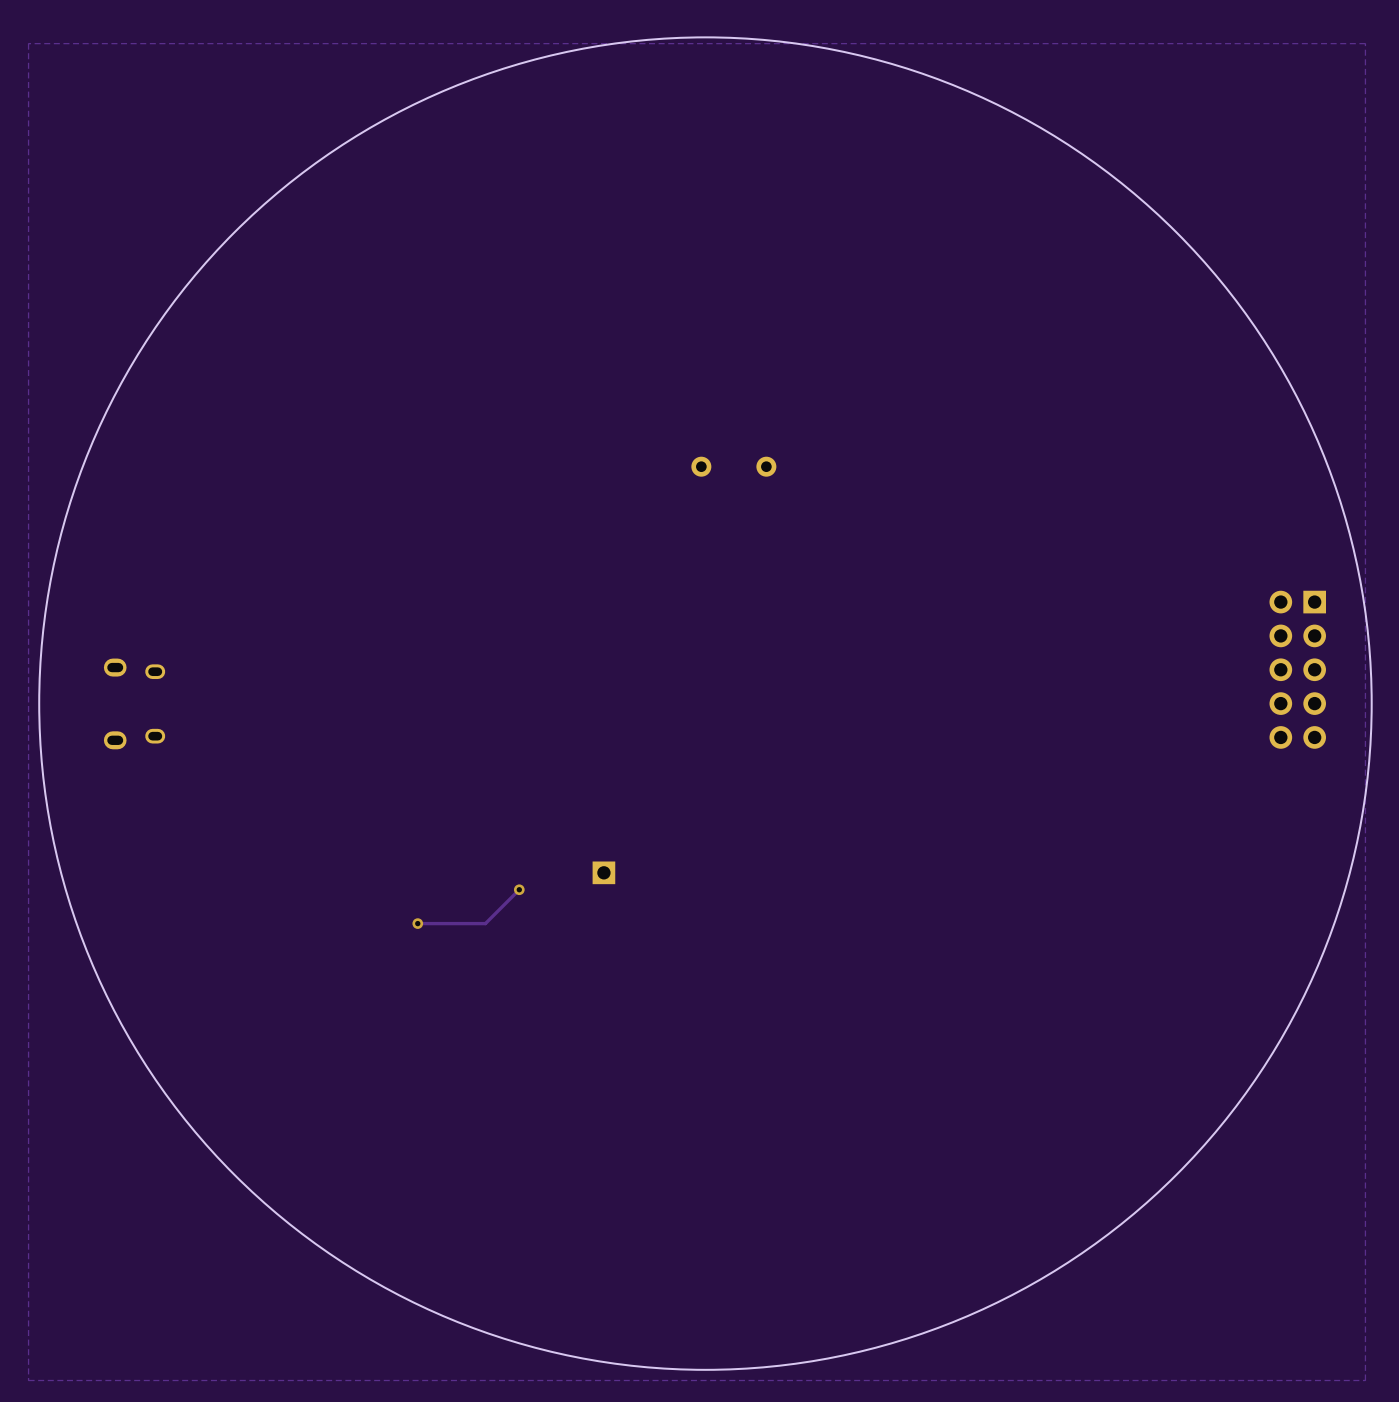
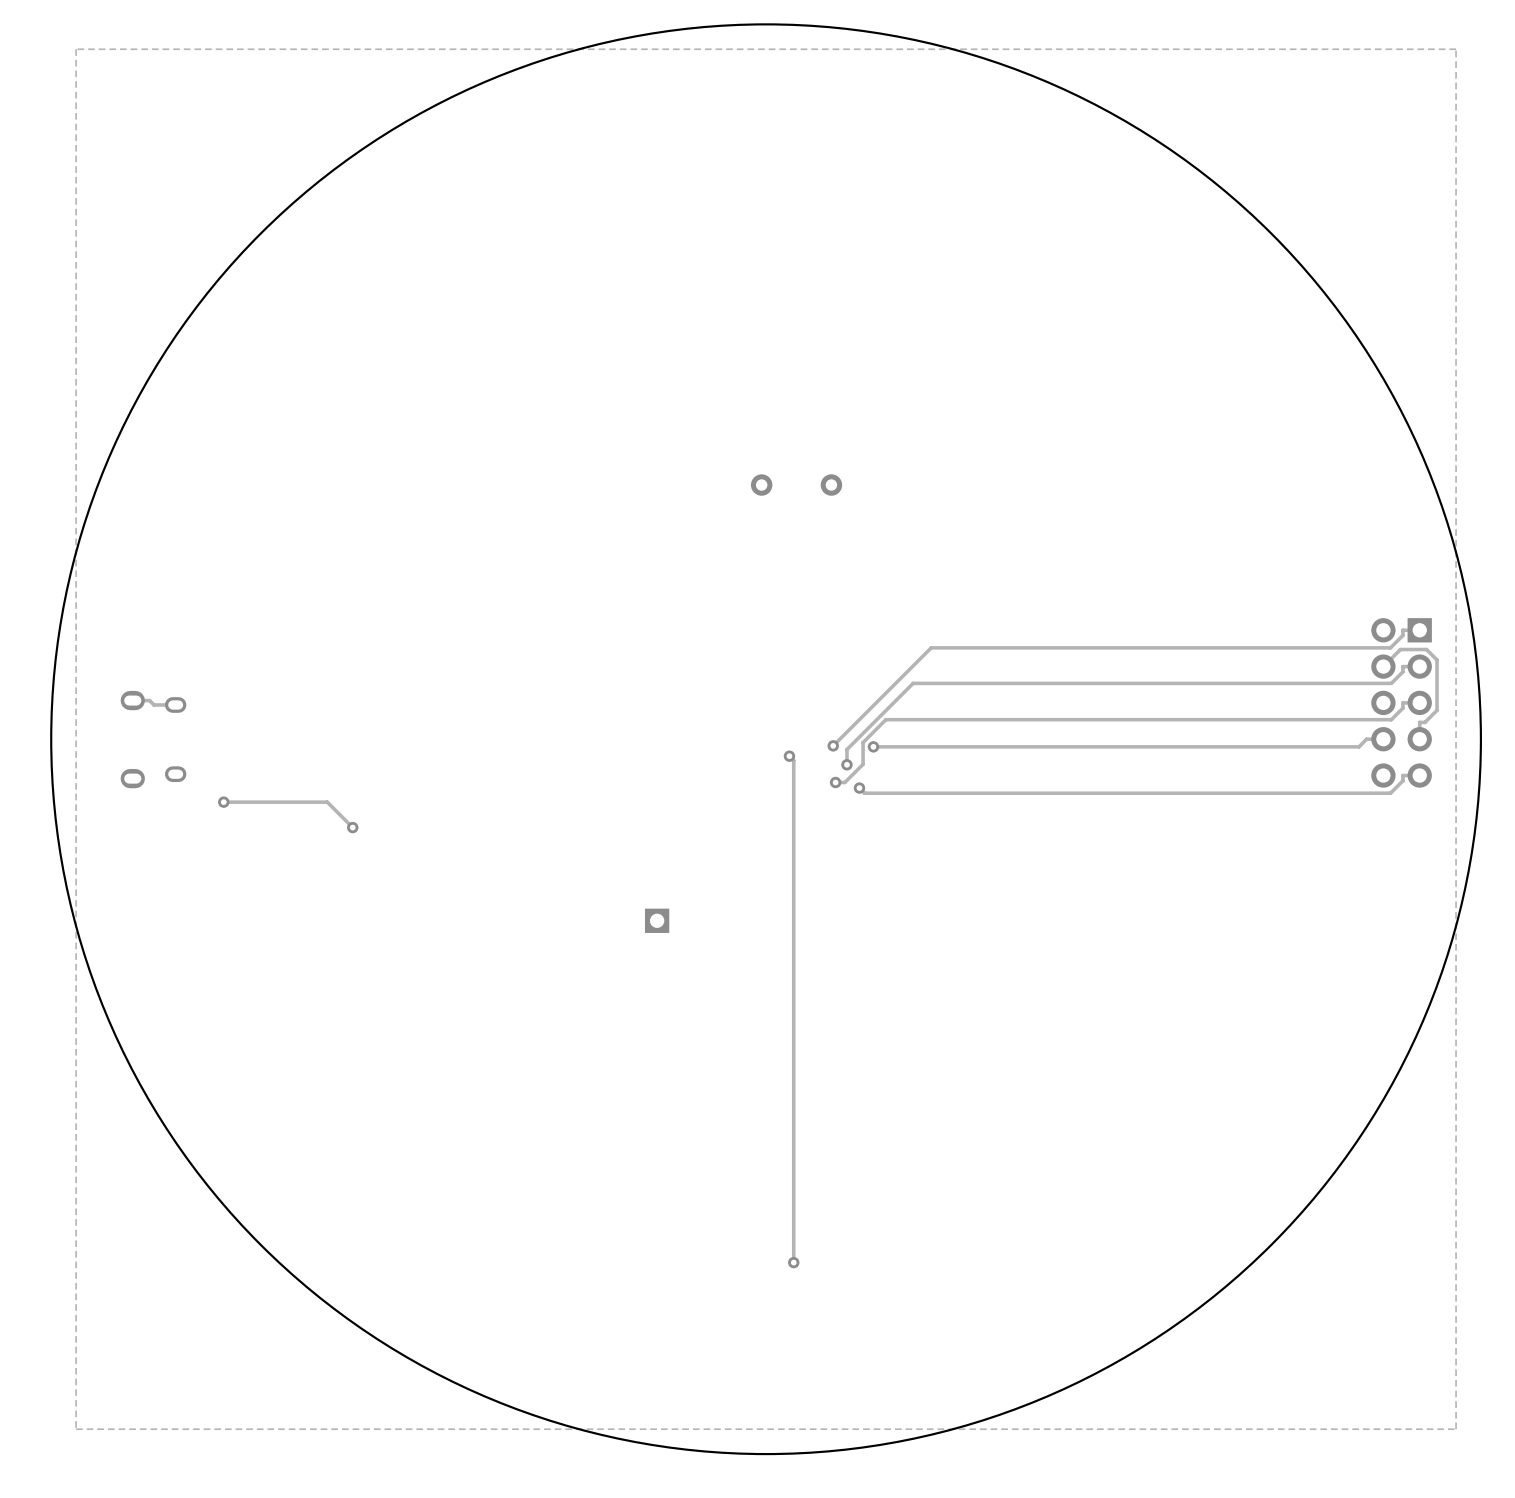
zone outline: (1365, 43) (28, 43) (28, 1380) (1365, 1380) (1365, 43) -> (1456, 49) (1456, 1429) (76, 1429) (76, 49) (1456, 49)
track: none -> (1419, 630) (1402, 630) (1402, 635) (1390, 647) (931, 647) (833, 745)
track: none -> (1383, 666) (1400, 649) (1426, 649) (1437, 659) (1437, 710) (1424, 722) (1419, 722) (1419, 739)
track: none -> (1419, 666) (1402, 666) (1402, 671) (1391, 683) (913, 683) (846, 749) (846, 764)
track: none -> (132, 700) (149, 700) (154, 704) (175, 704)
track: none -> (1419, 702) (1402, 702) (1402, 708) (1391, 719) (885, 719) (863, 742) (863, 764) (844, 782) (835, 782)
track: none -> (1383, 739) (1366, 739) (1358, 746) (873, 746)
via: none -> (833, 745)
via: none -> (873, 746)
track: none -> (789, 756) (793, 760) (793, 1262)
via: none -> (789, 756)
via: none -> (846, 764)
track: none -> (1419, 775) (1402, 775) (1402, 780) (1390, 793) (864, 793) (859, 788)
via: none -> (835, 782)
via: none -> (859, 788)
track: none -> (223, 802) (327, 802) (352, 827)
via: none -> (223, 802)
via: none -> (352, 827)
track: (519, 889) (485, 923) (417, 923) -> none
via: (519, 889) -> none
via: (417, 923) -> none
via: none -> (793, 1262)

